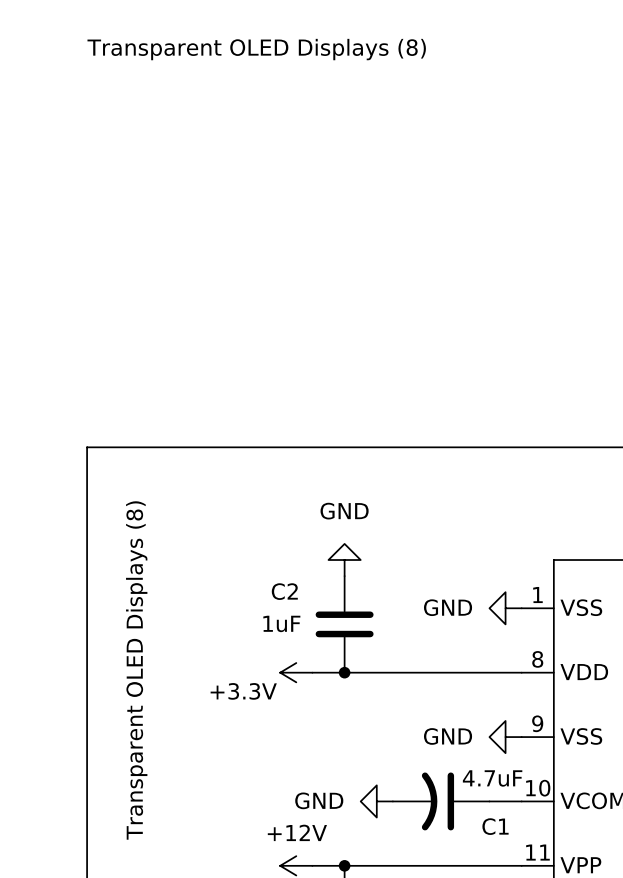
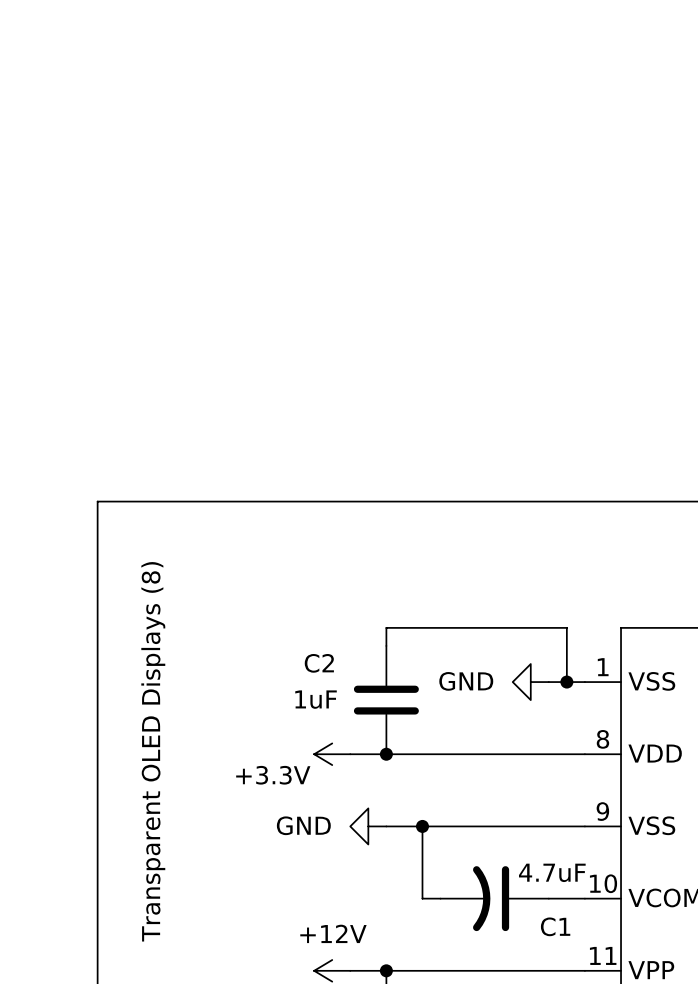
text: Transparent OLED Displays (8) (256, 49) -> none
power symbol: GND (344, 560) -> none
wire: none -> (386, 645) (386, 627) (566, 627) (566, 682)
power symbol position: GND (505, 608) -> GND (530, 682)
junction: none -> (566, 682)
power symbol: none -> GND (368, 826)
wire: none -> (386, 826) (584, 826)
wire: none -> (422, 826) (422, 898) (440, 898)
junction: none -> (422, 826)
power symbol: GND (505, 737) -> none
power symbol: GND (376, 801) -> none

